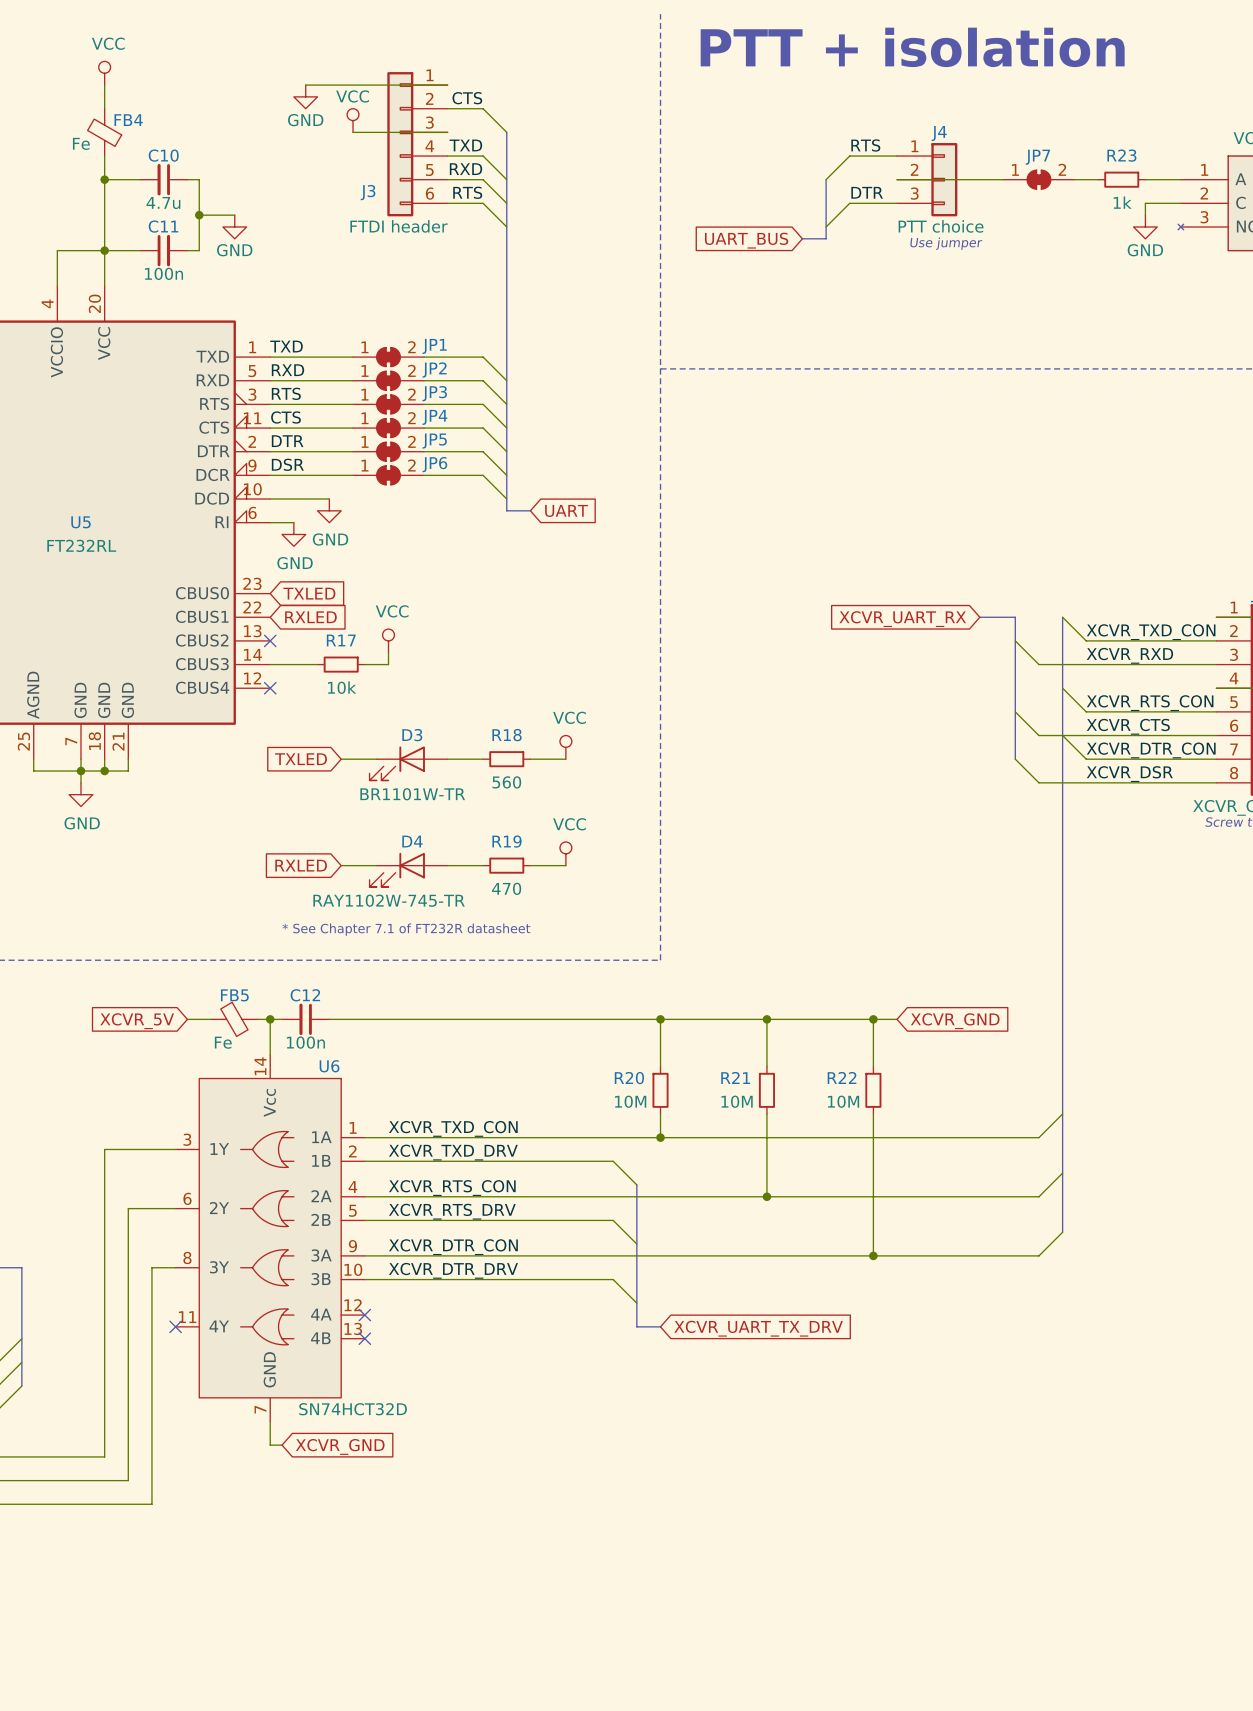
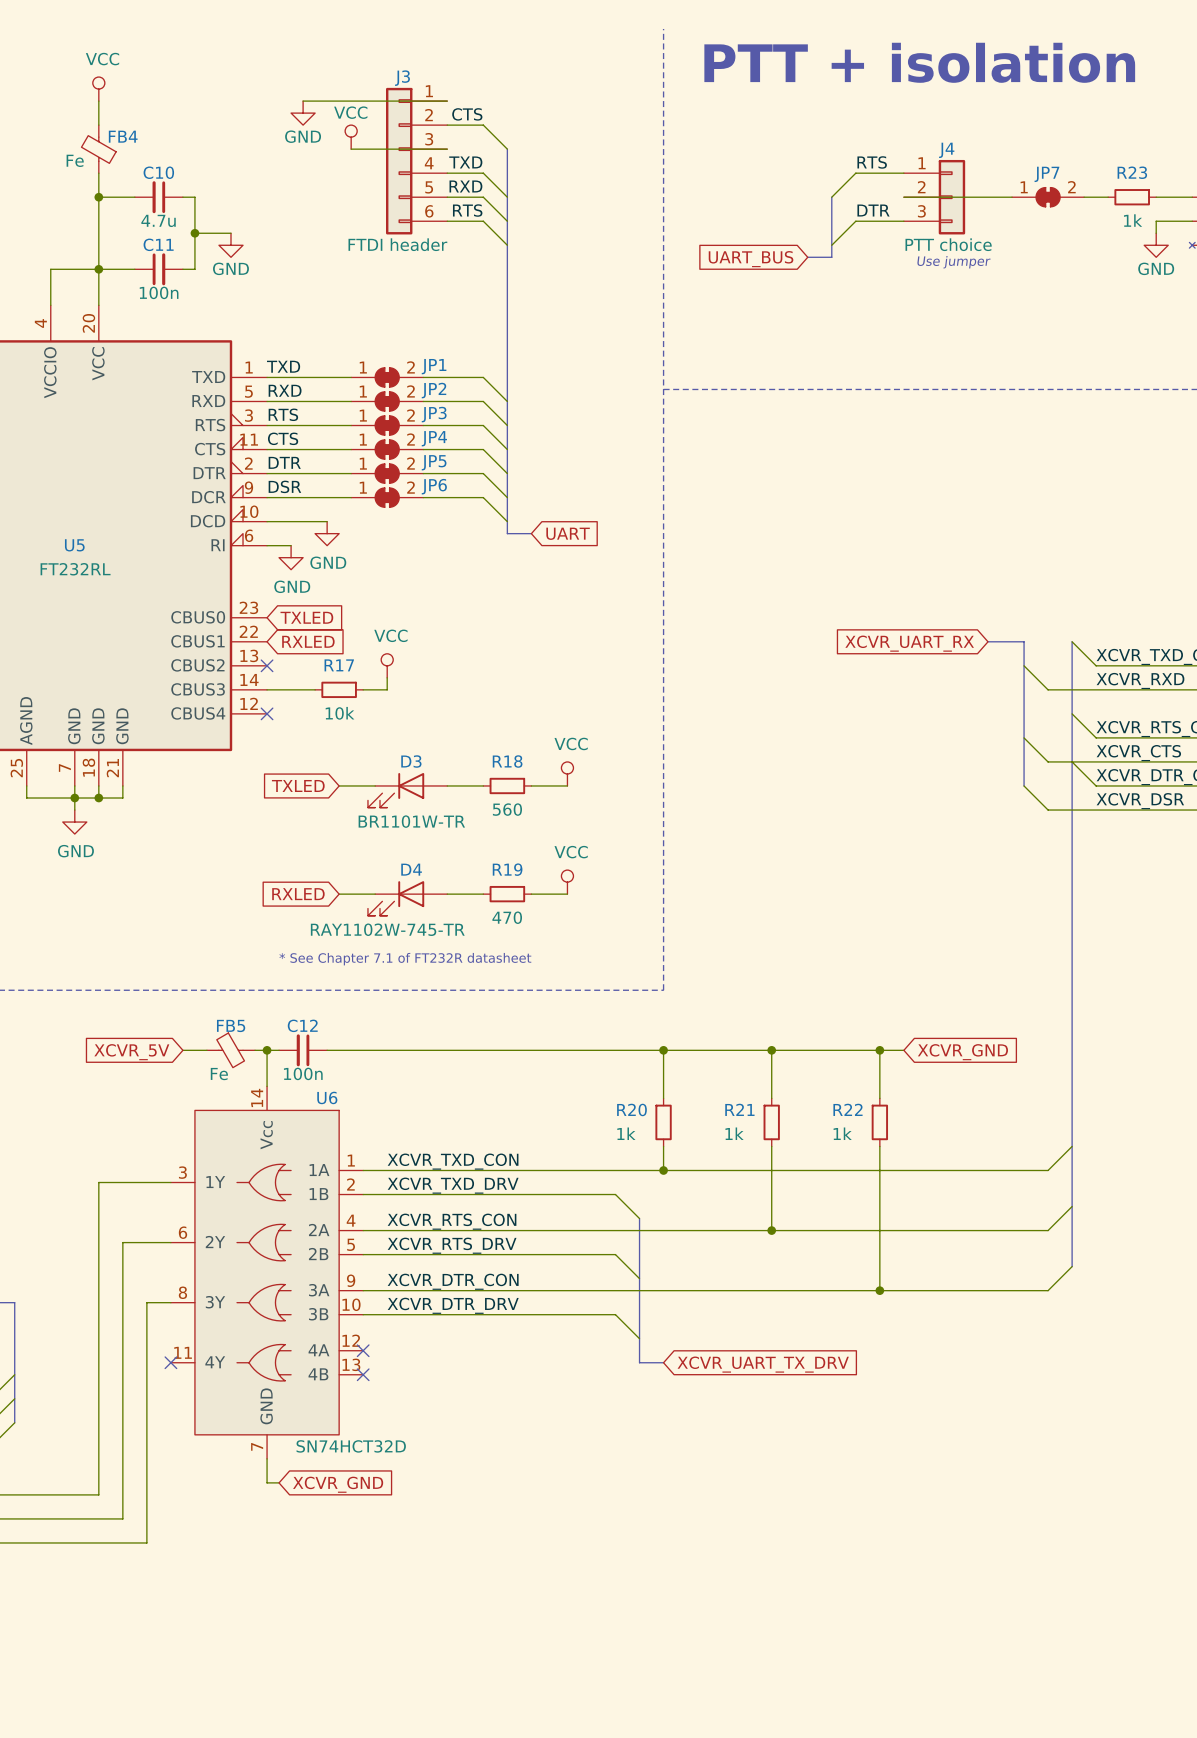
J3 name position: J3 (368, 192) -> J3 (402, 78)
R20 value: 10M (630, 1101) -> 1k (626, 1133)
R21 value: 10M (737, 1101) -> 1k (734, 1133)
R22 value: 10M (843, 1101) -> 1k (842, 1133)

